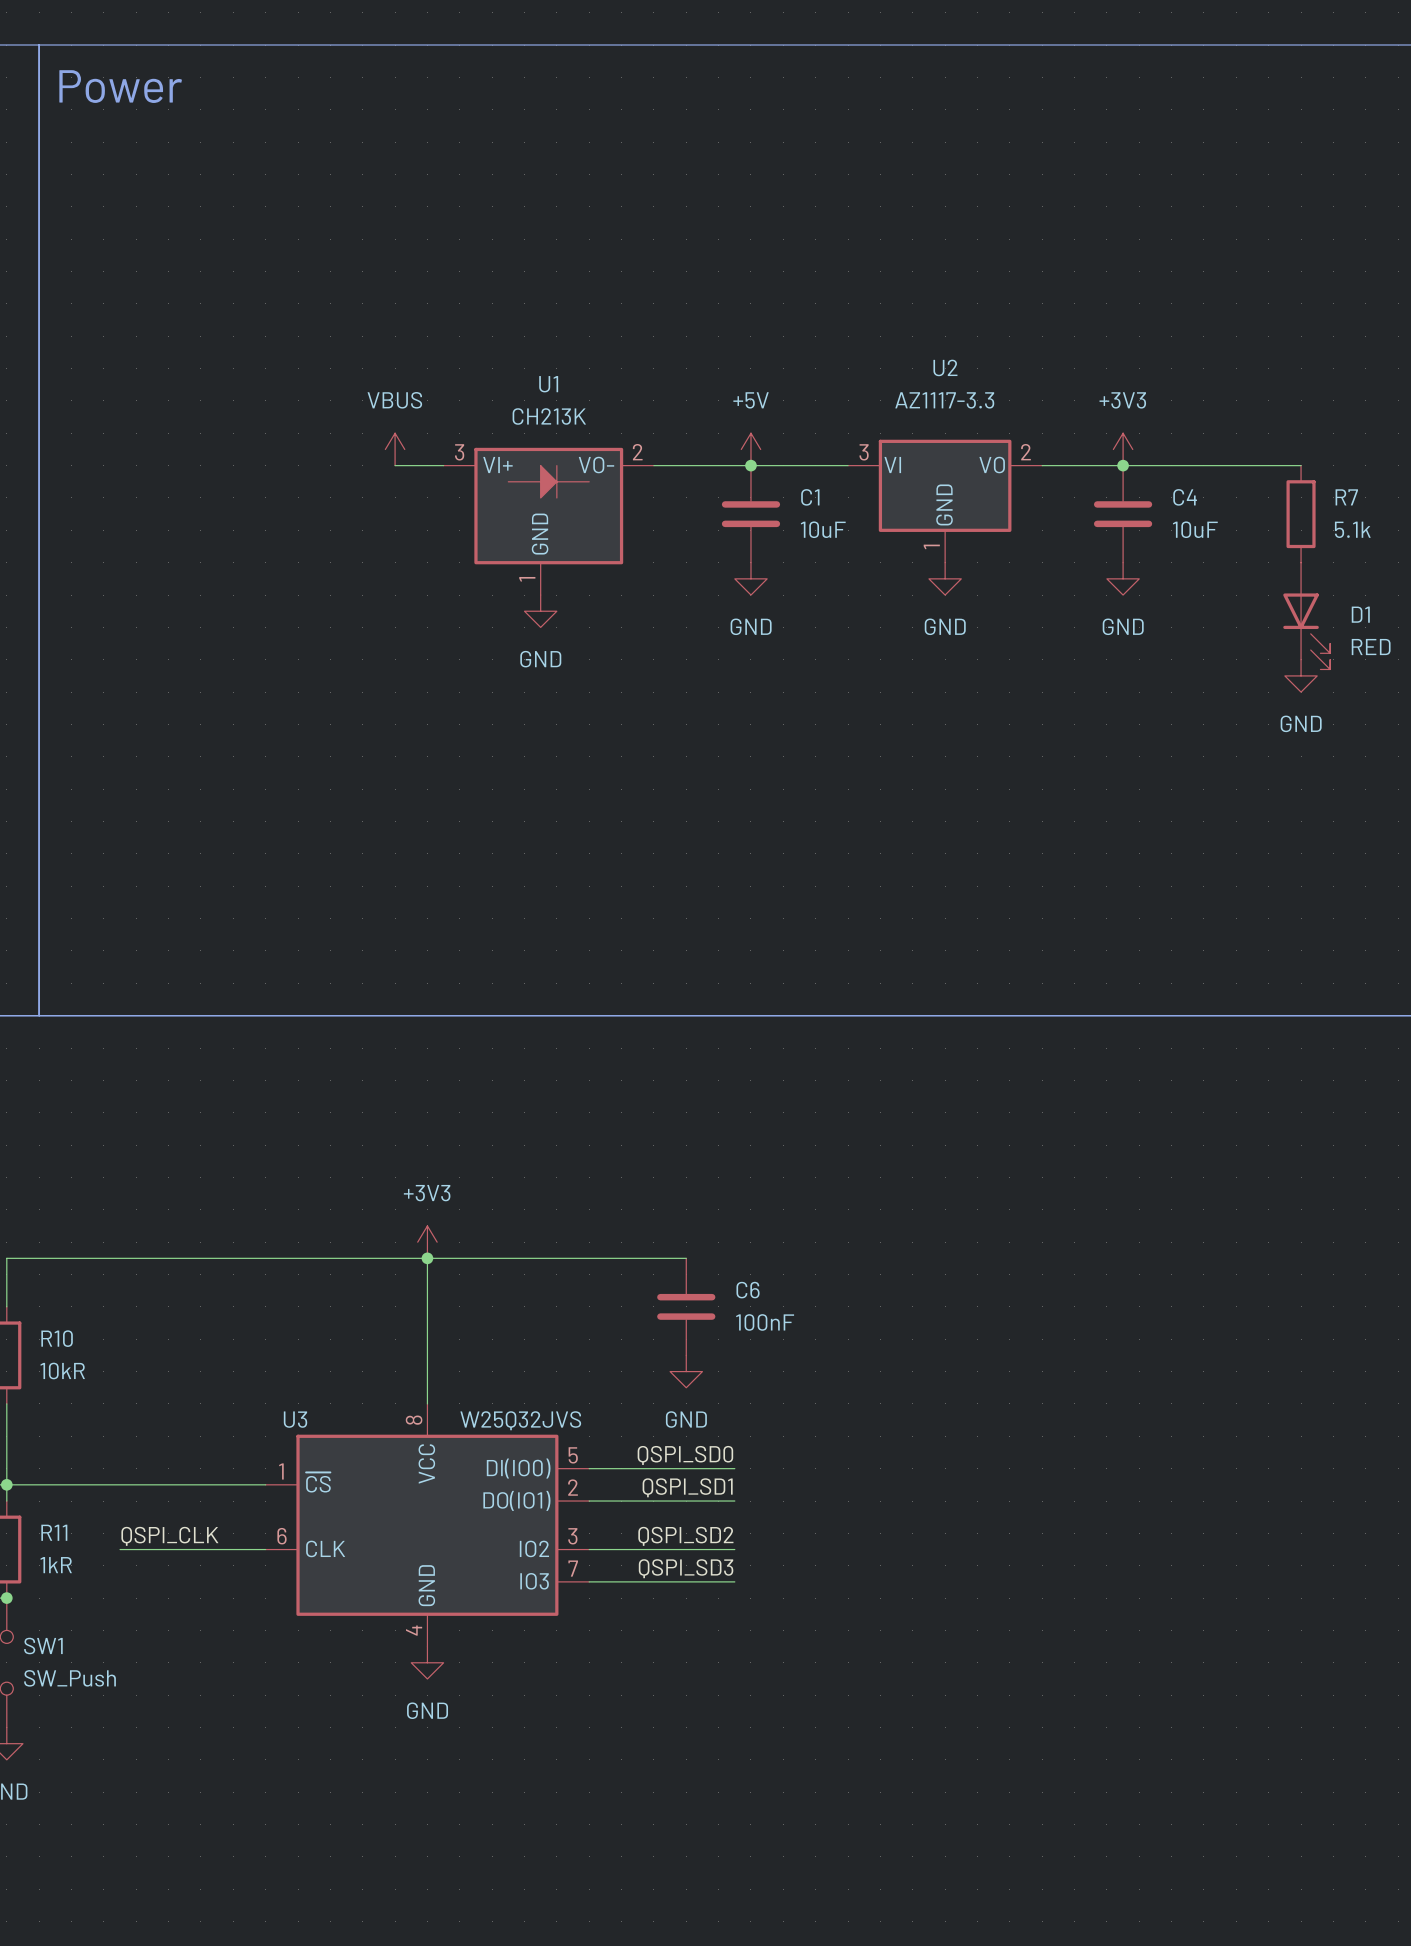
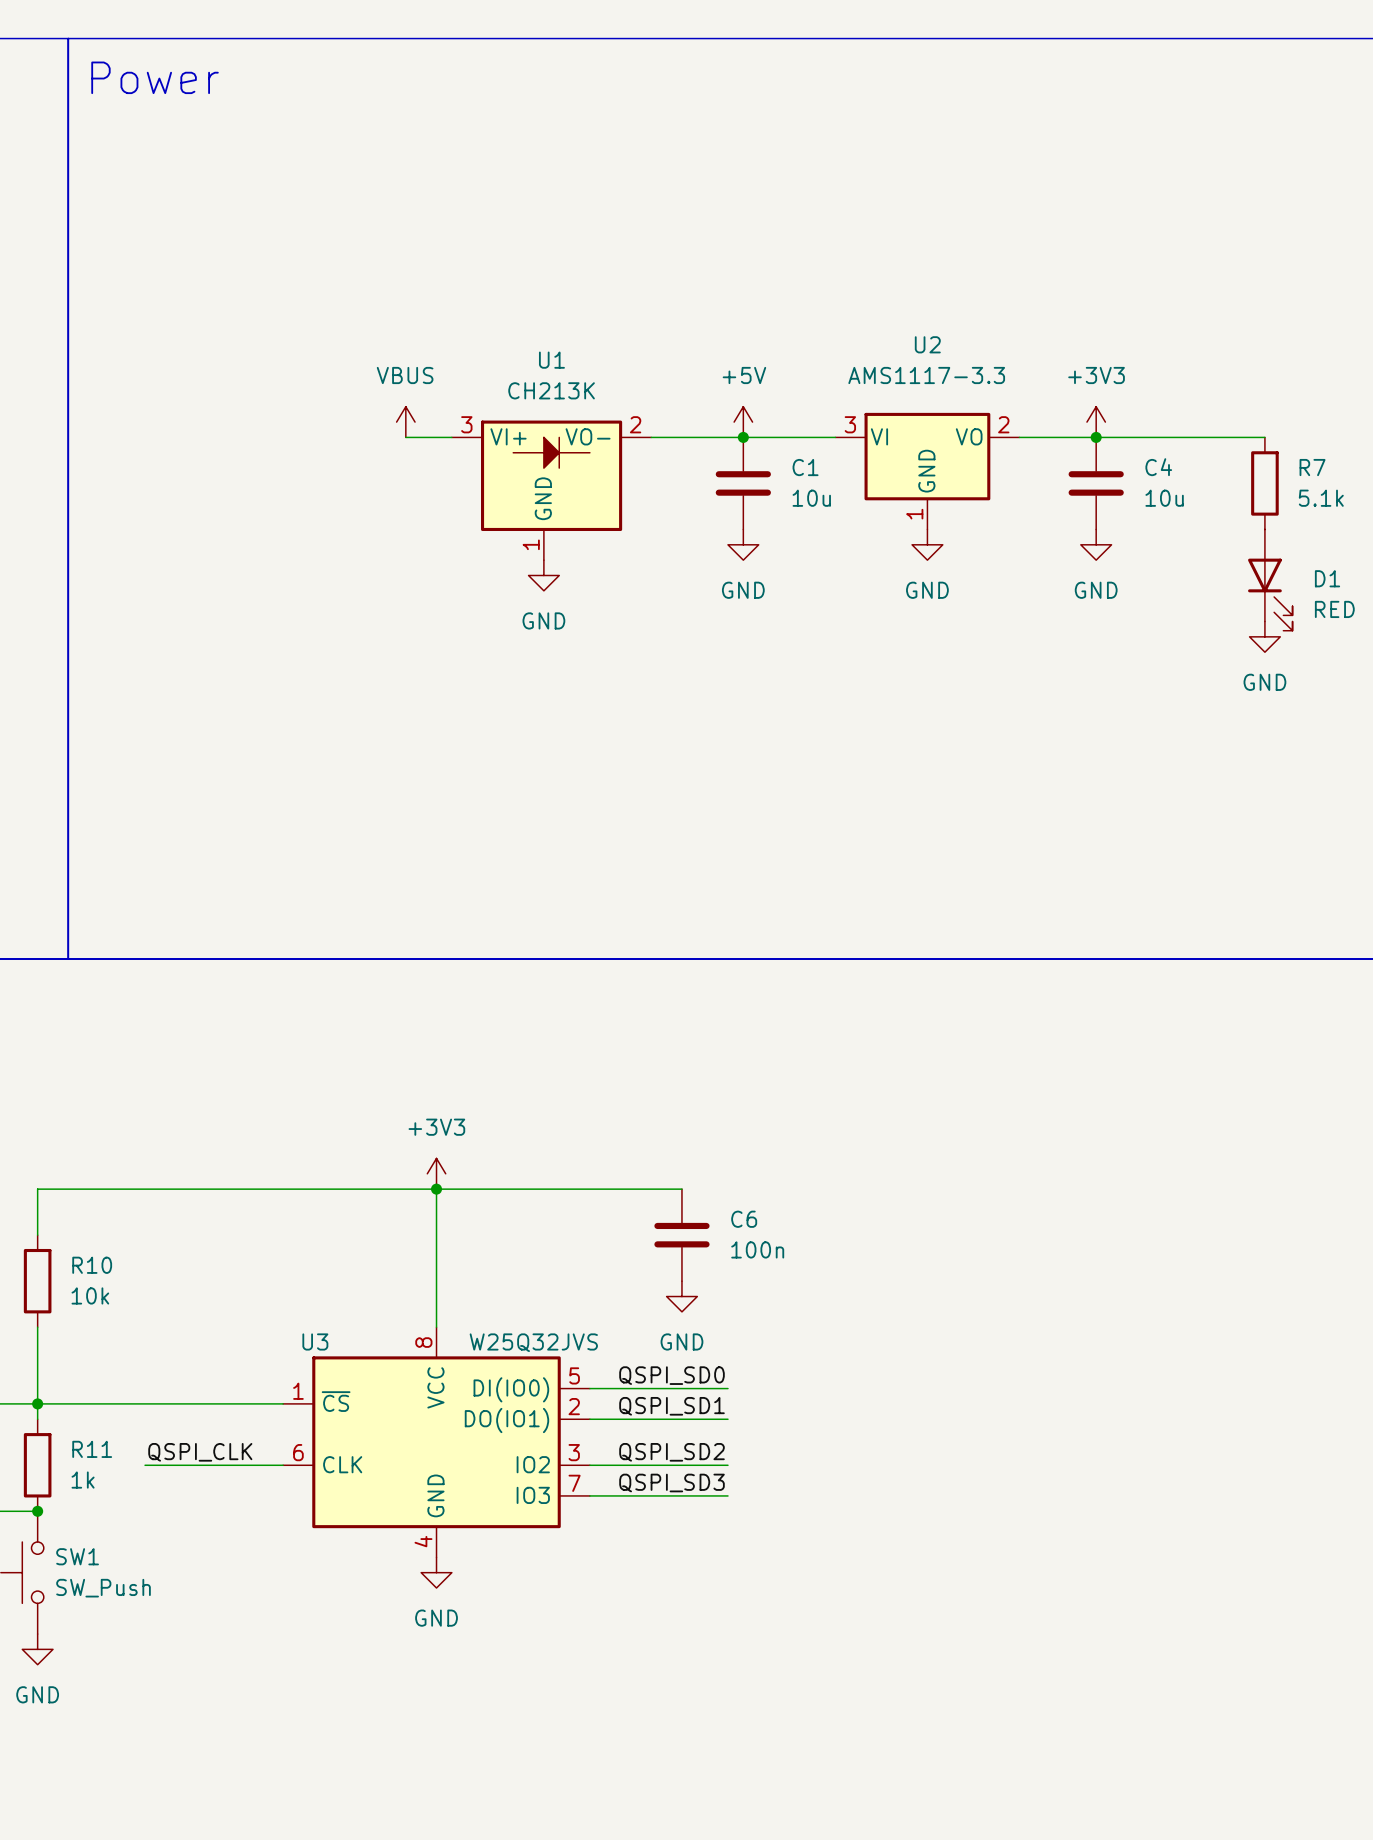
U2 value: AZ1117-3.3 (944, 400) -> AMS1117-3.3 (926, 375)
C1 value: 10uF (823, 529) -> 10u (811, 498)
C4 value: 10uF (1195, 529) -> 10u (1164, 498)
C6 value: 100nF (765, 1322) -> 100n (757, 1249)
R10 value: 10kR (62, 1370) -> 10k (90, 1295)
R11 value: 1kR (56, 1565) -> 1k (83, 1480)

